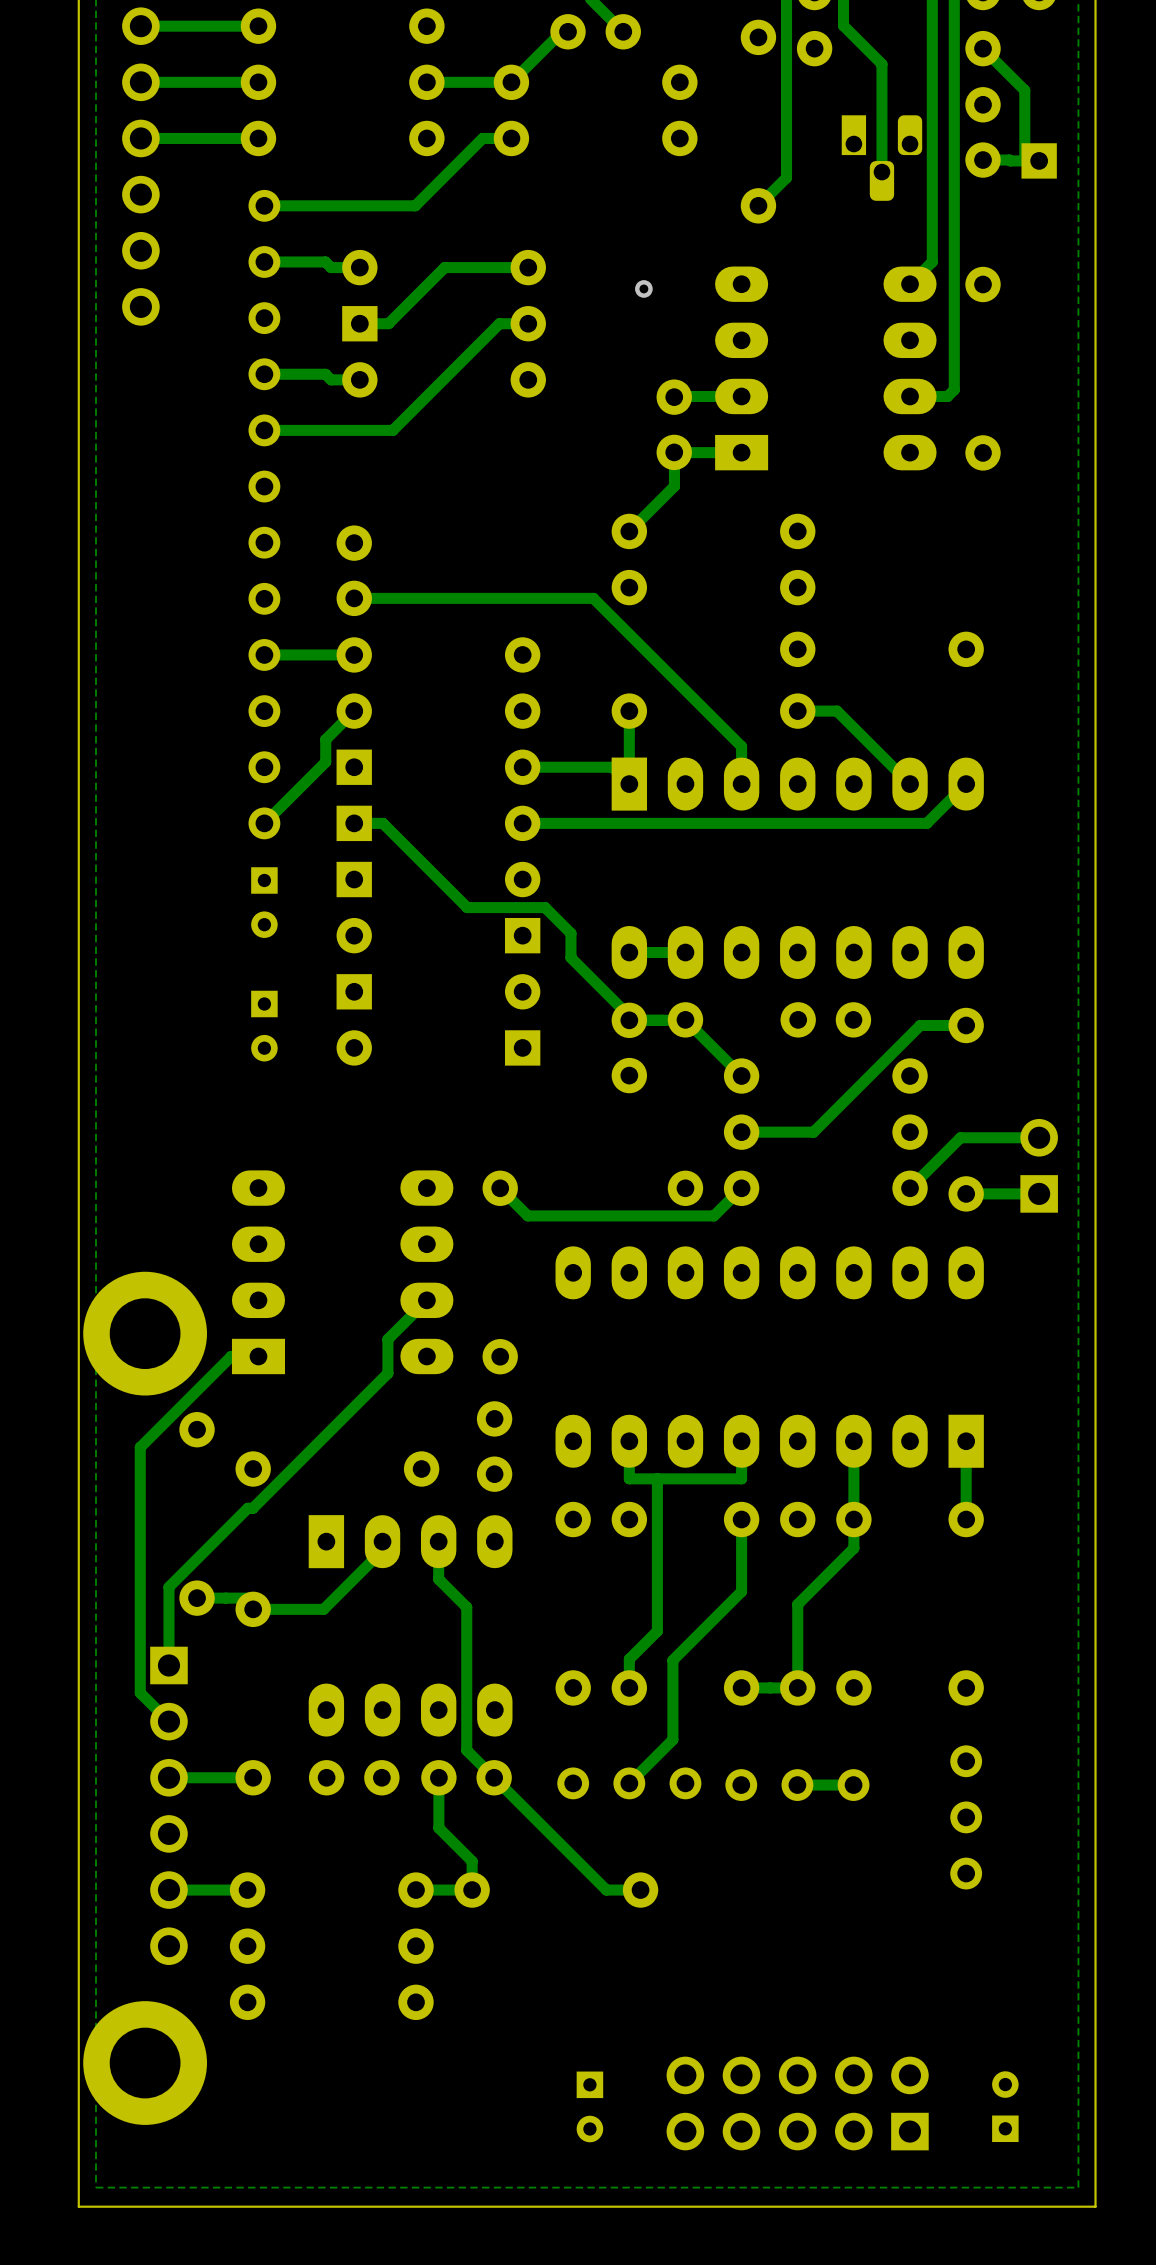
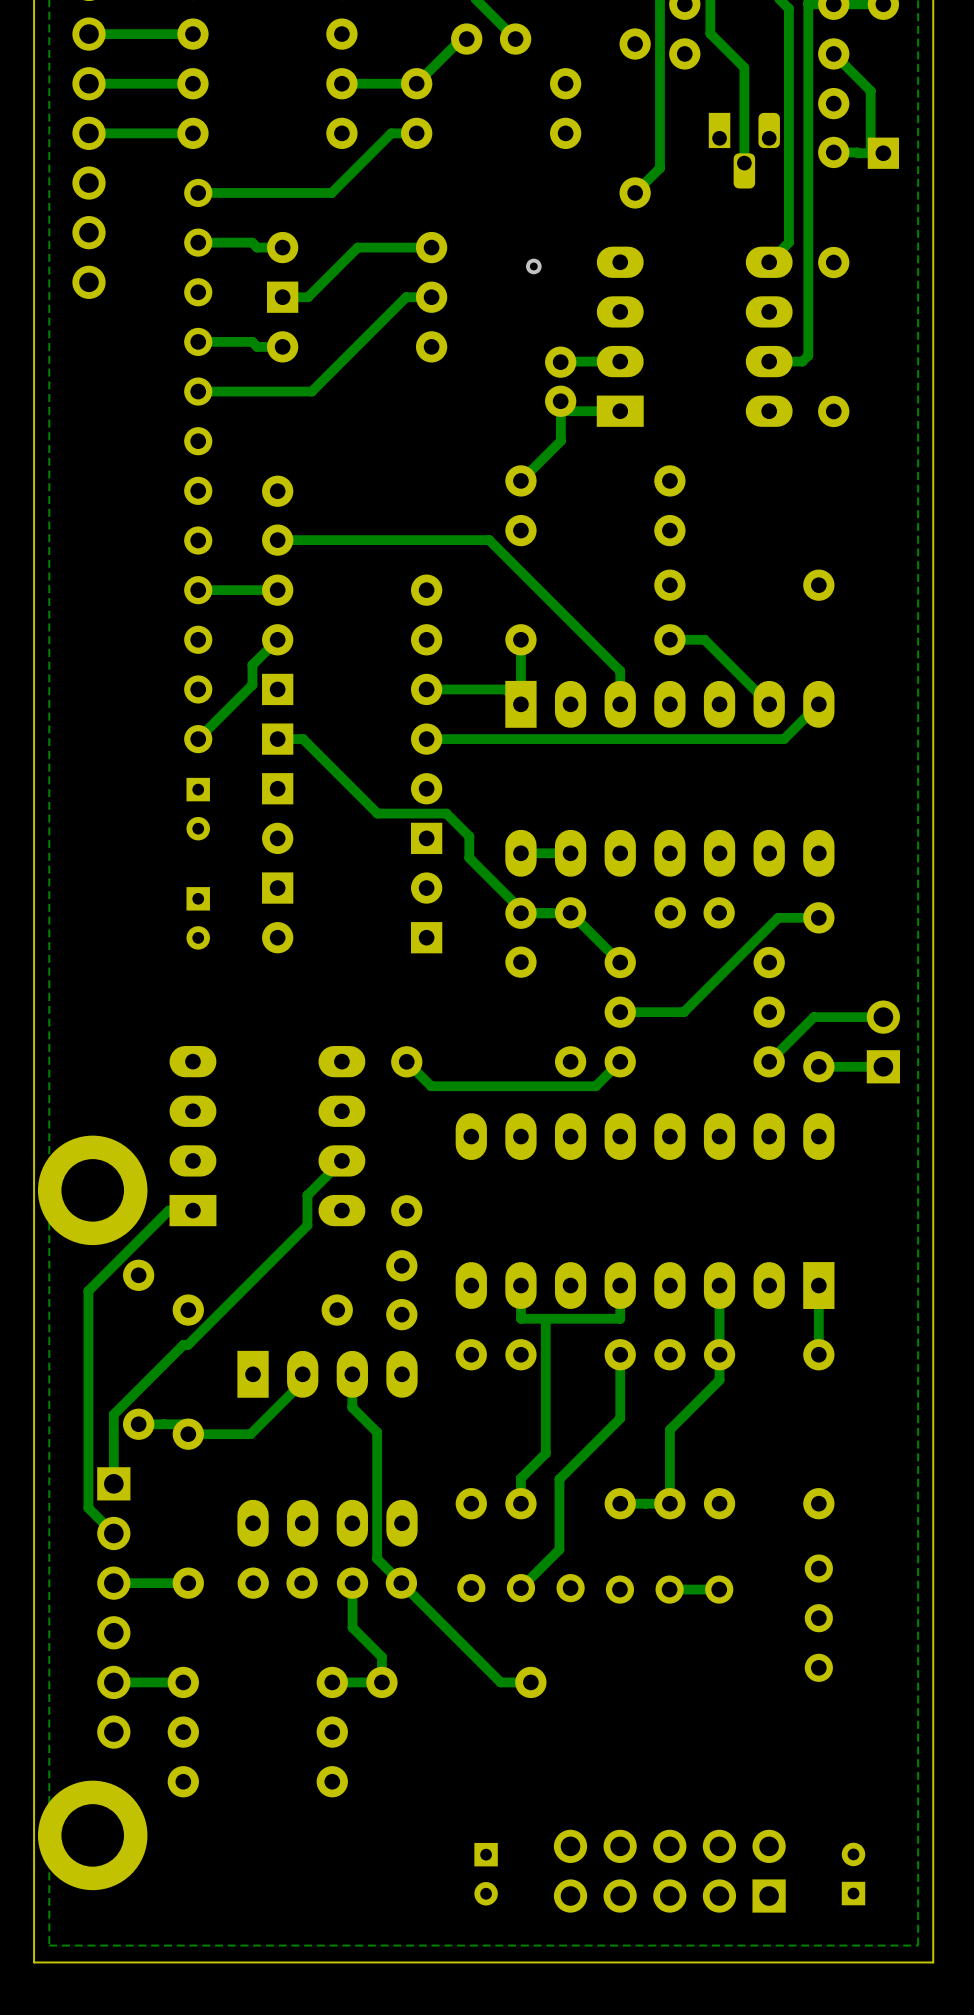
part footprint: [656, 379, 692, 471] -> [545, 346, 577, 417]

